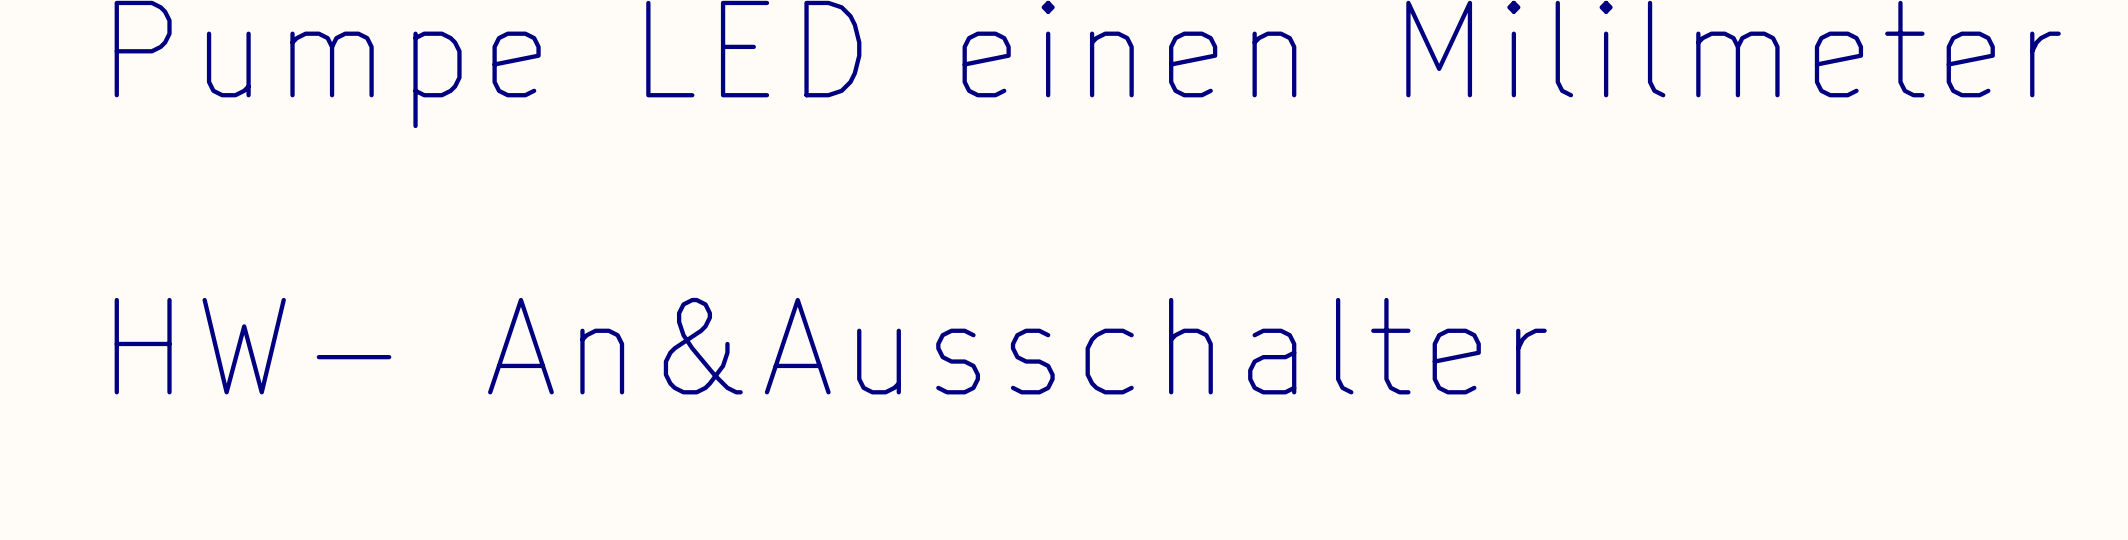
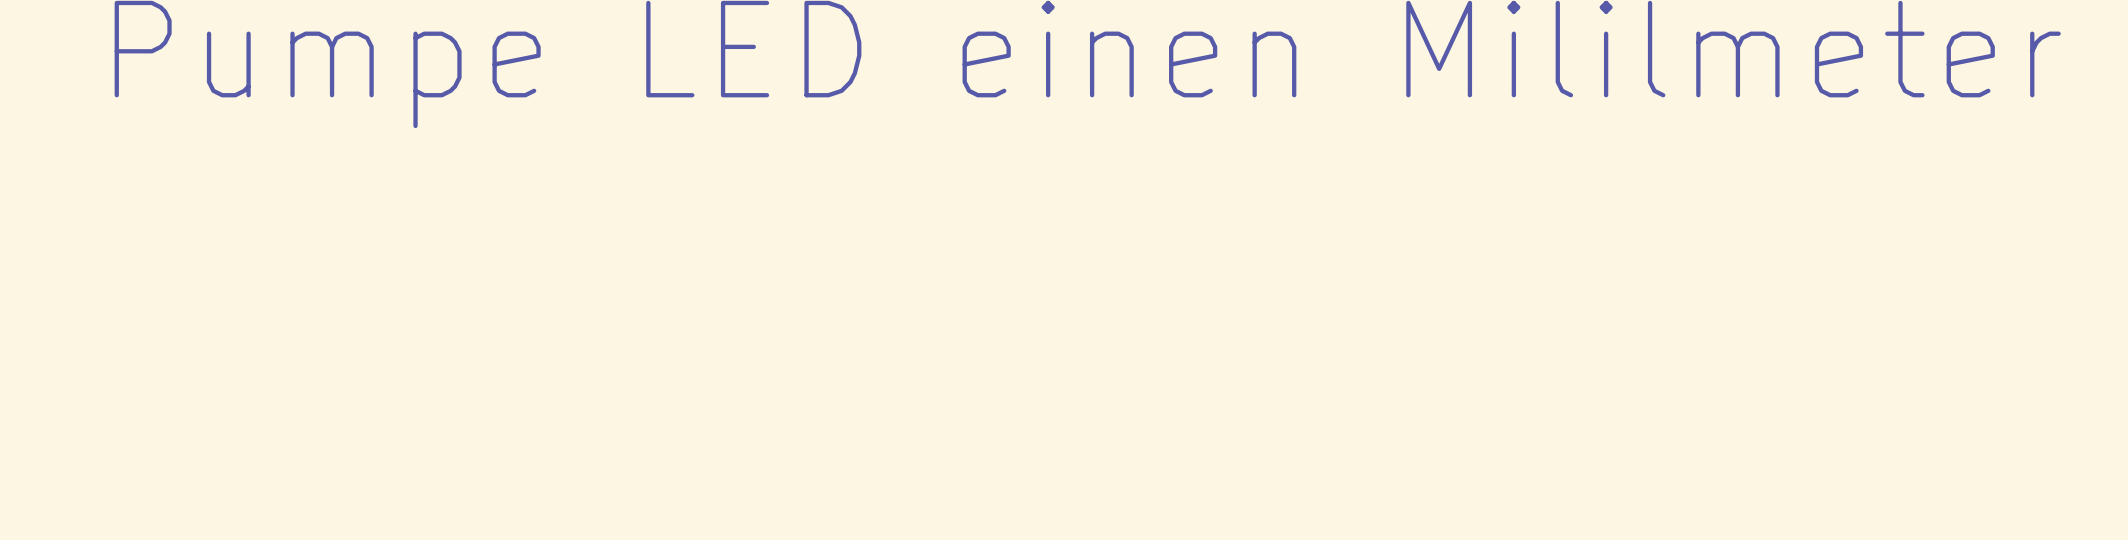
text: HW- An&Ausschalter (830, 346) -> none

